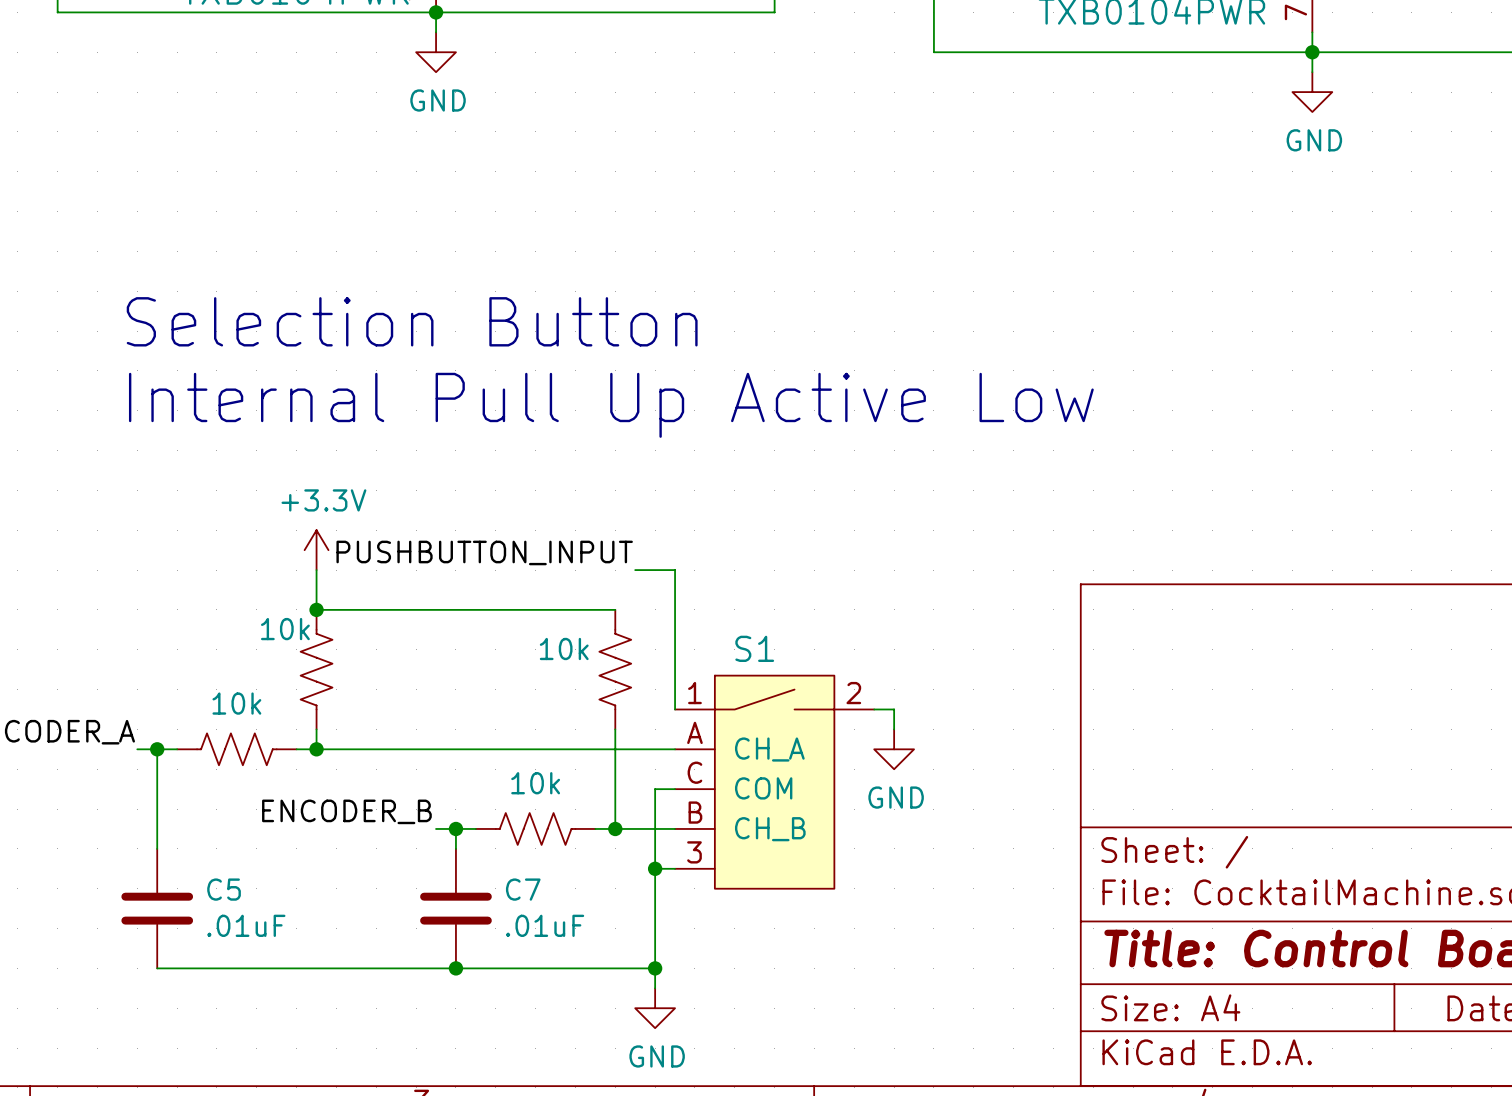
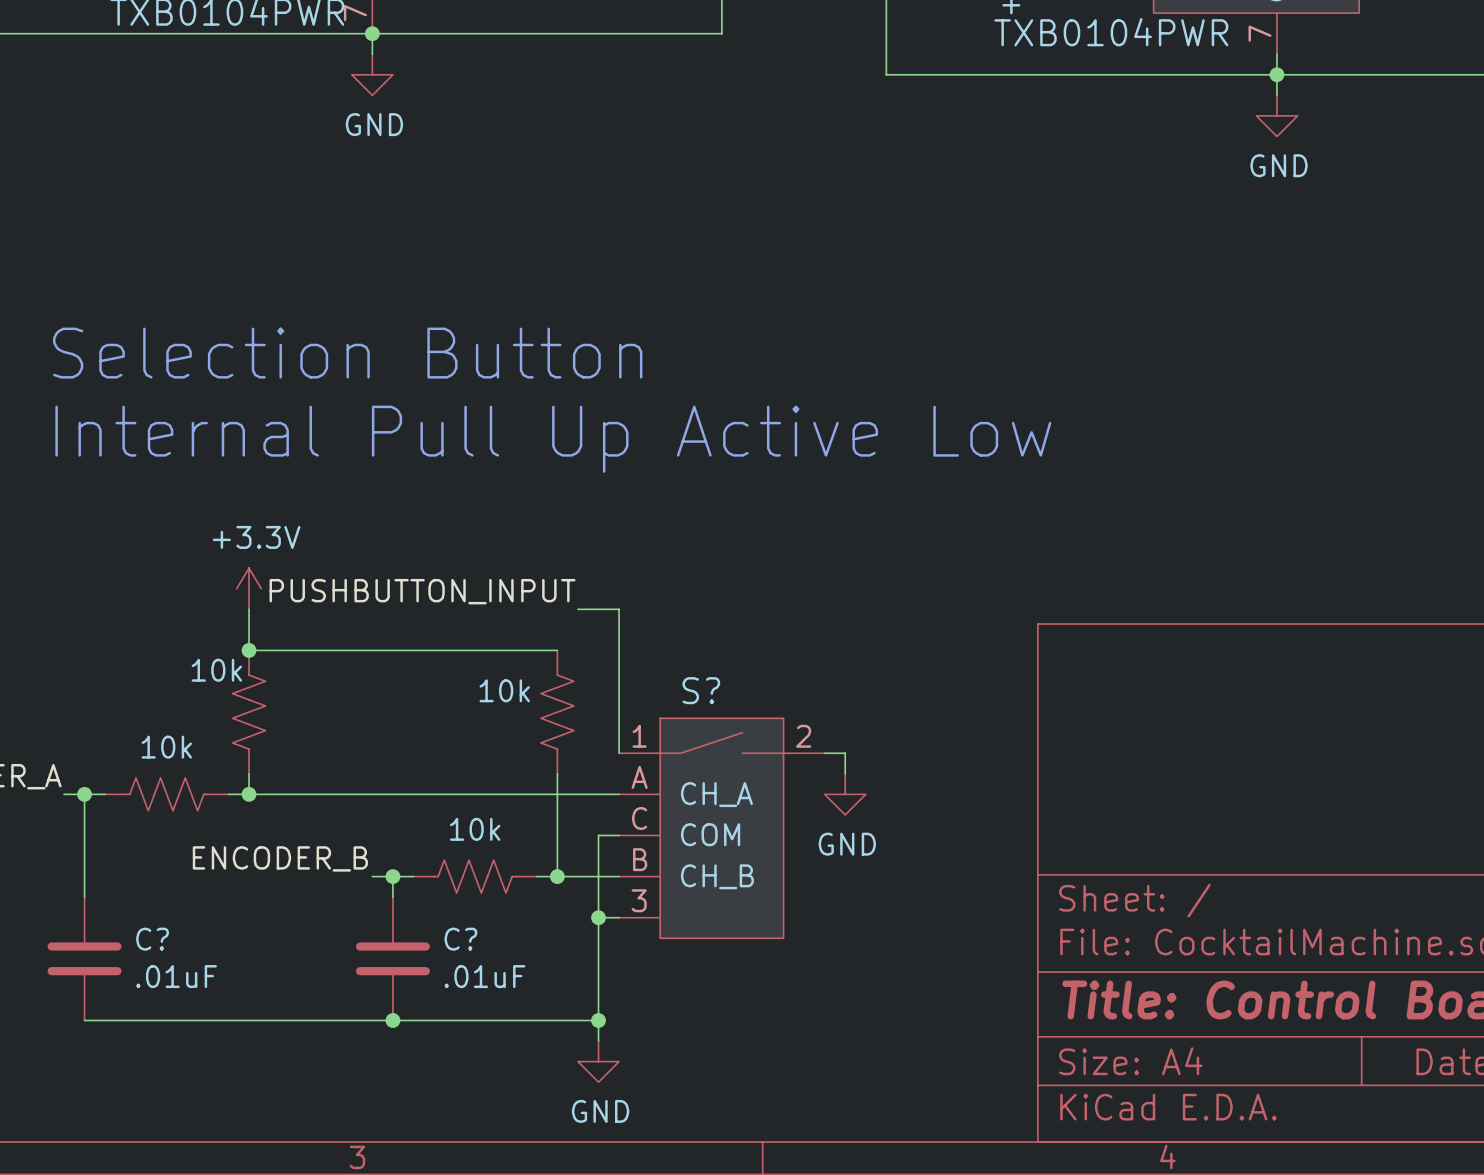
S1 name: S1 (754, 648) -> S? (701, 690)
C5 name: C5 (224, 889) -> C? (152, 939)
C7 name: C7 (523, 889) -> C? (460, 939)

